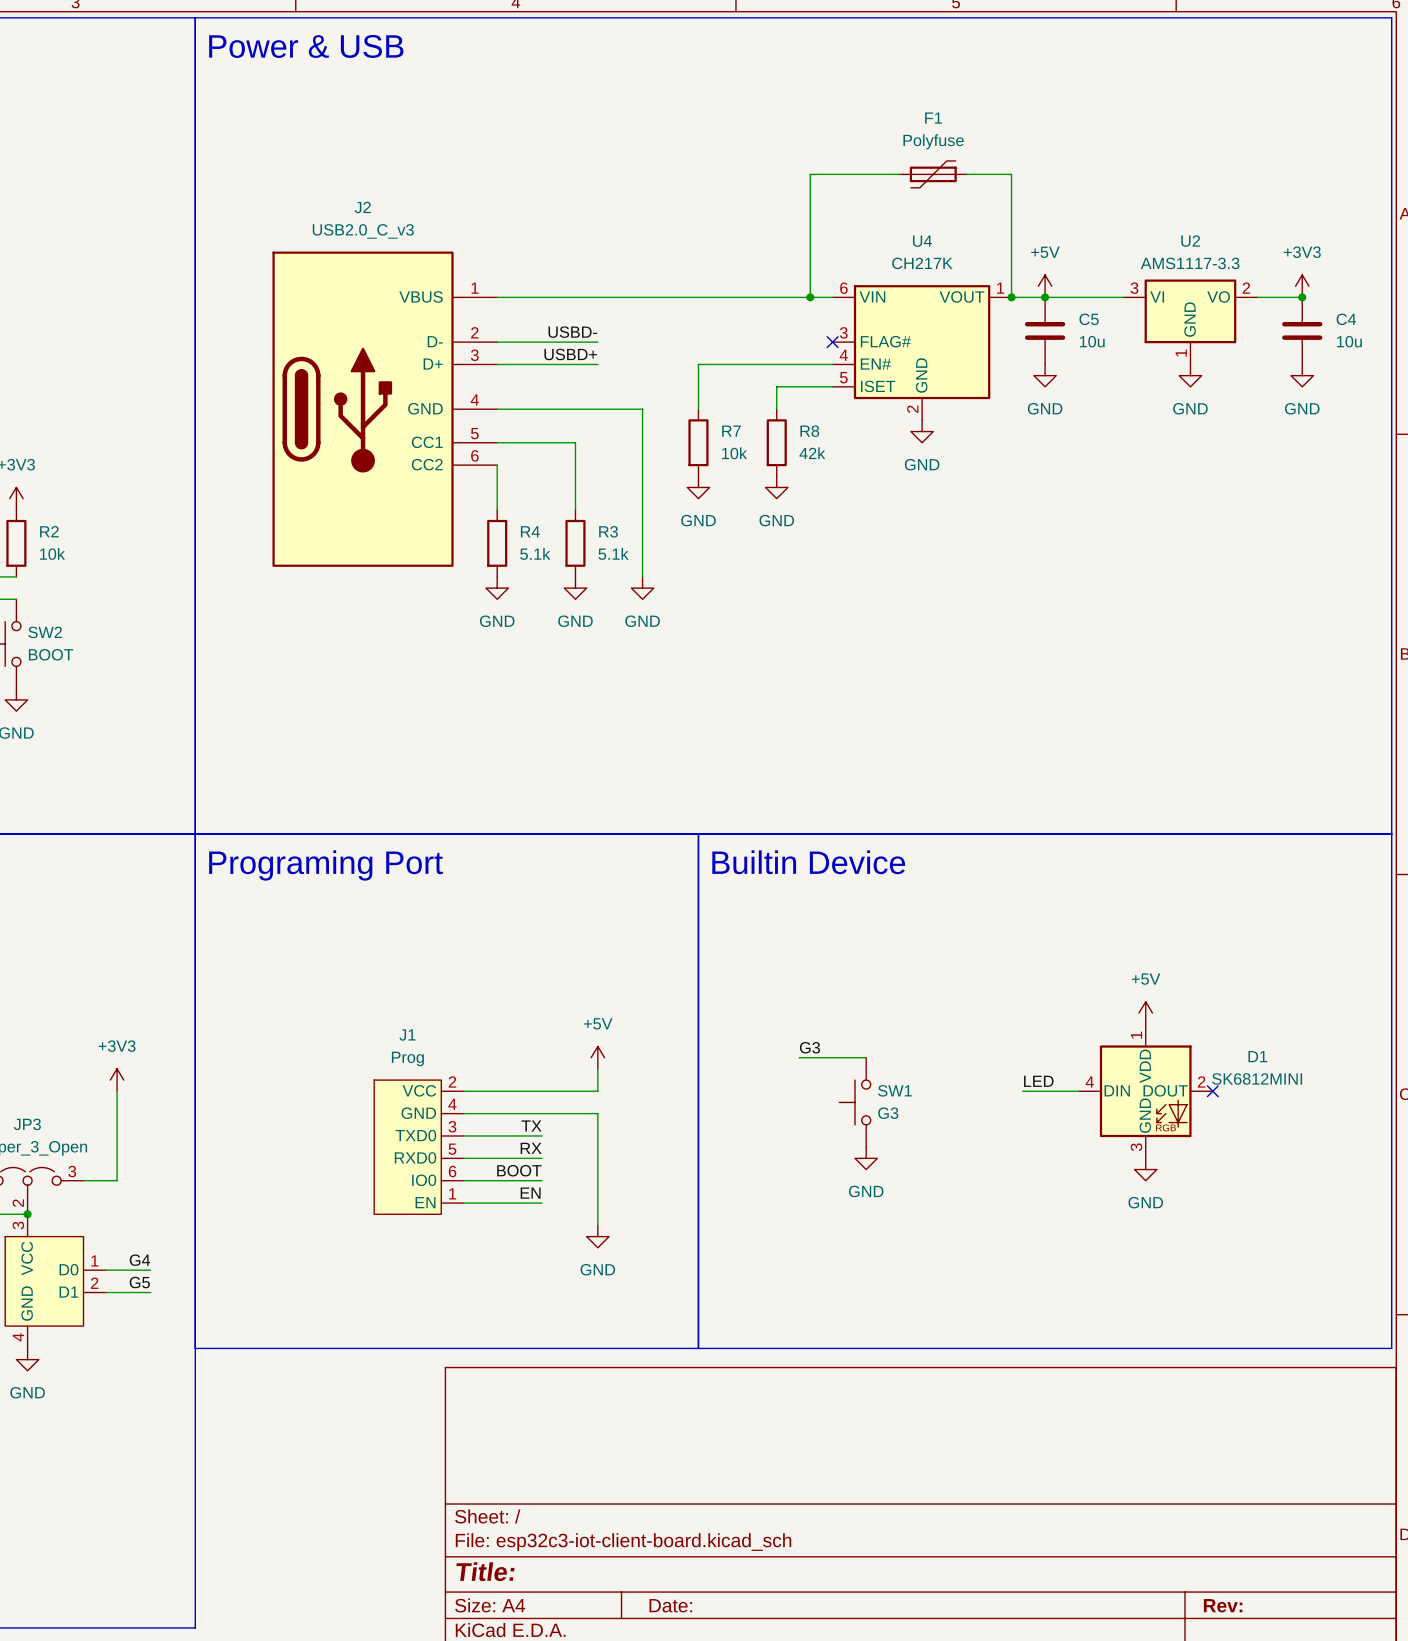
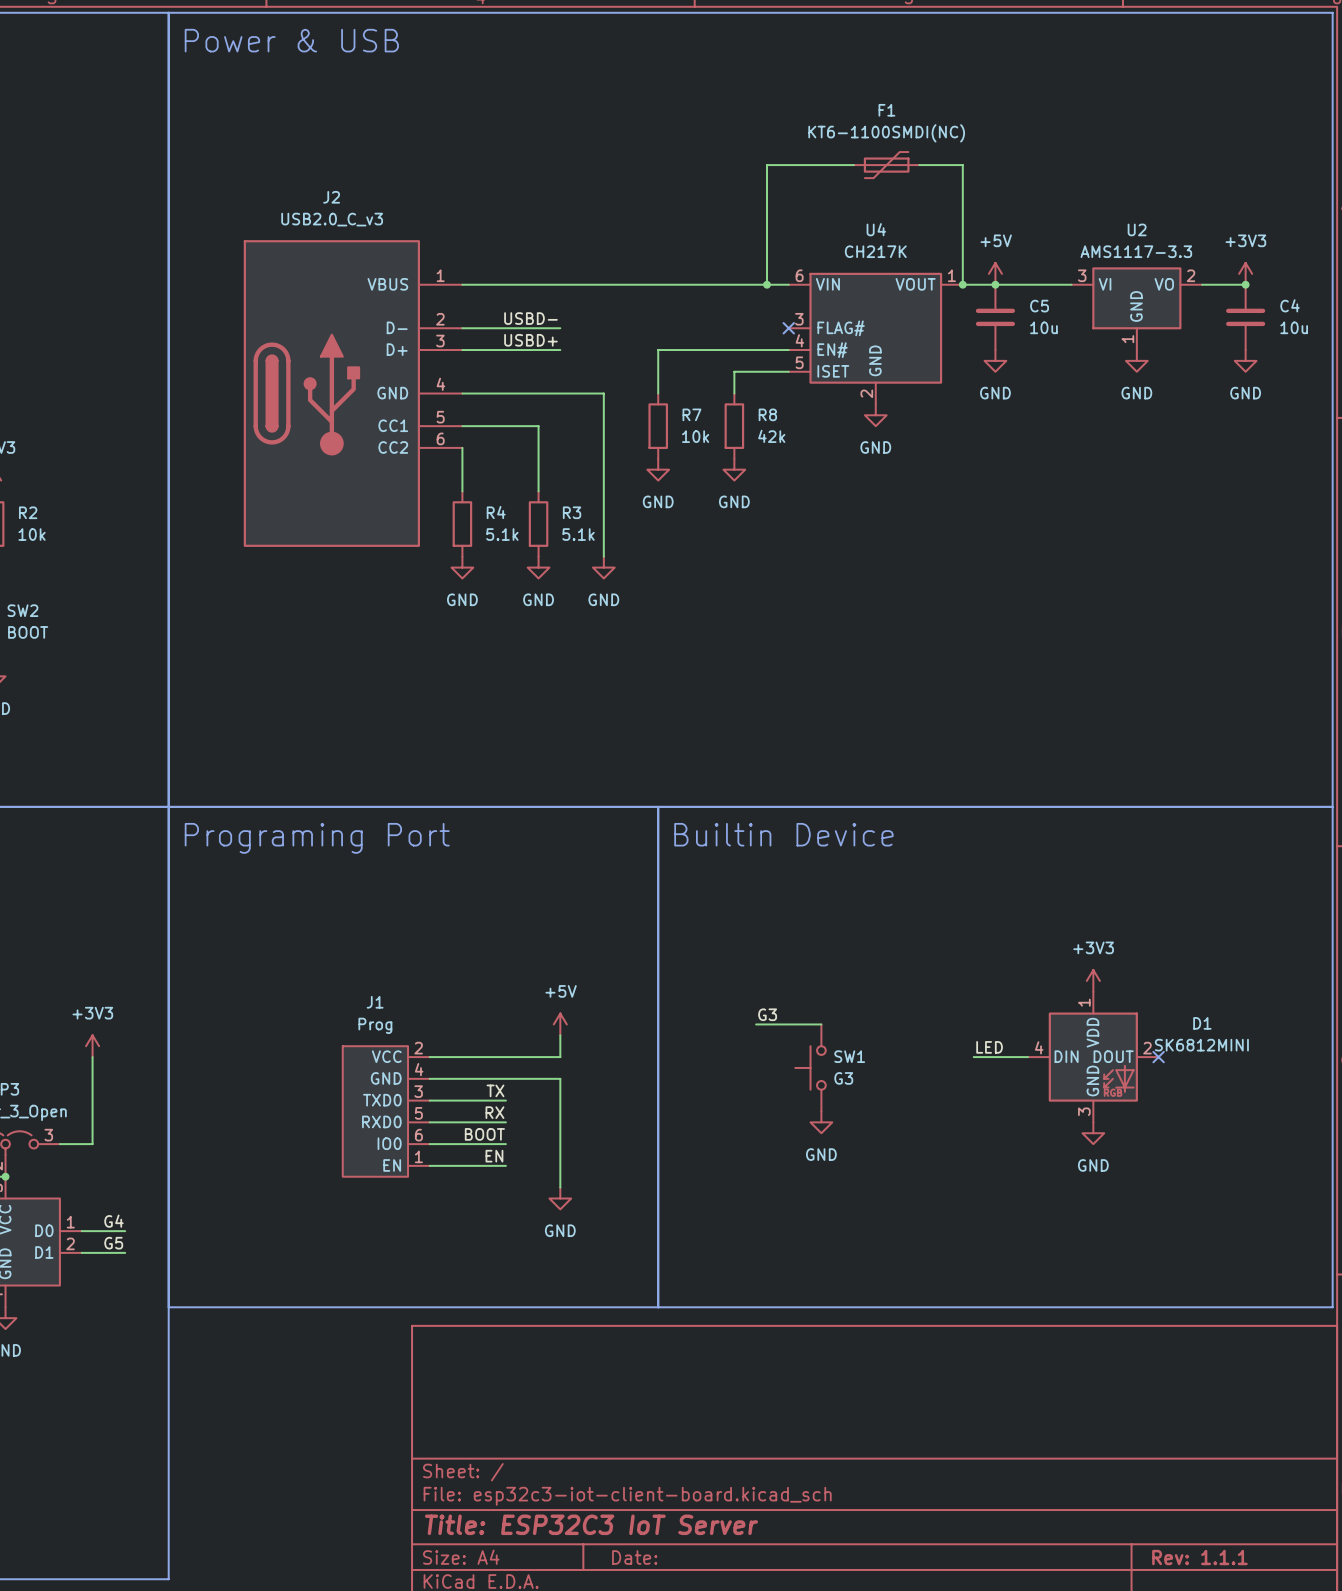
F1 value: Polyfuse (933, 141) -> KT6-1100SMDI(NC) (886, 133)
power symbol: +5V (1145, 1012) -> +3V3 (1093, 980)
title block: Title: (485, 1571) -> Title: ESP32C3 IoT Server (591, 1524)
title block: Rev: (1223, 1605) -> Rev: 1.1.1 (1199, 1557)

